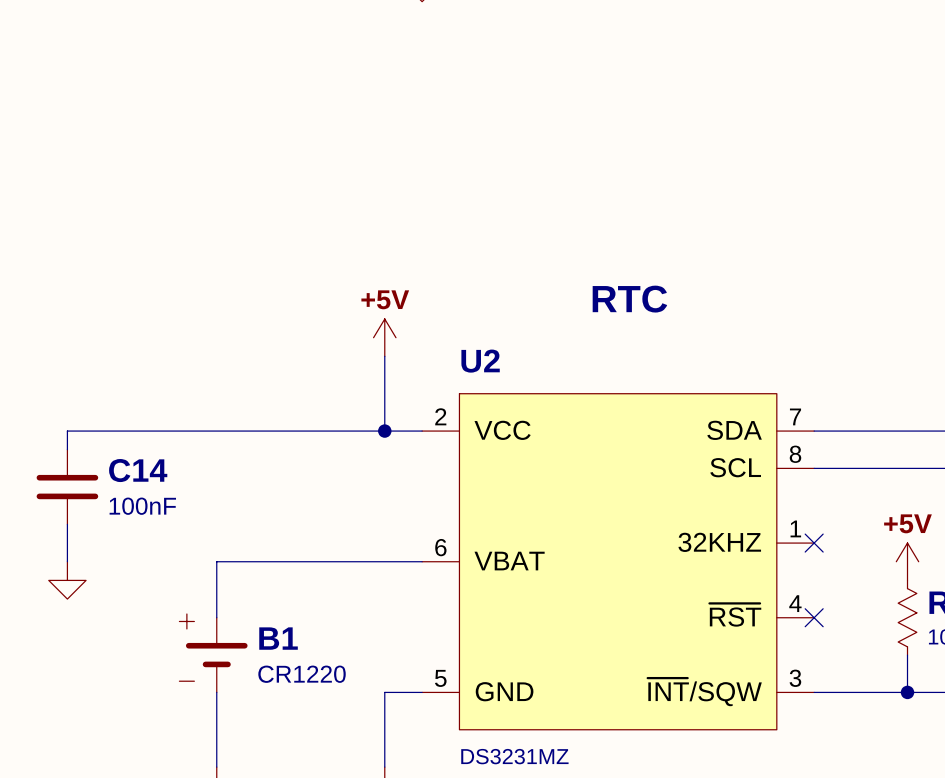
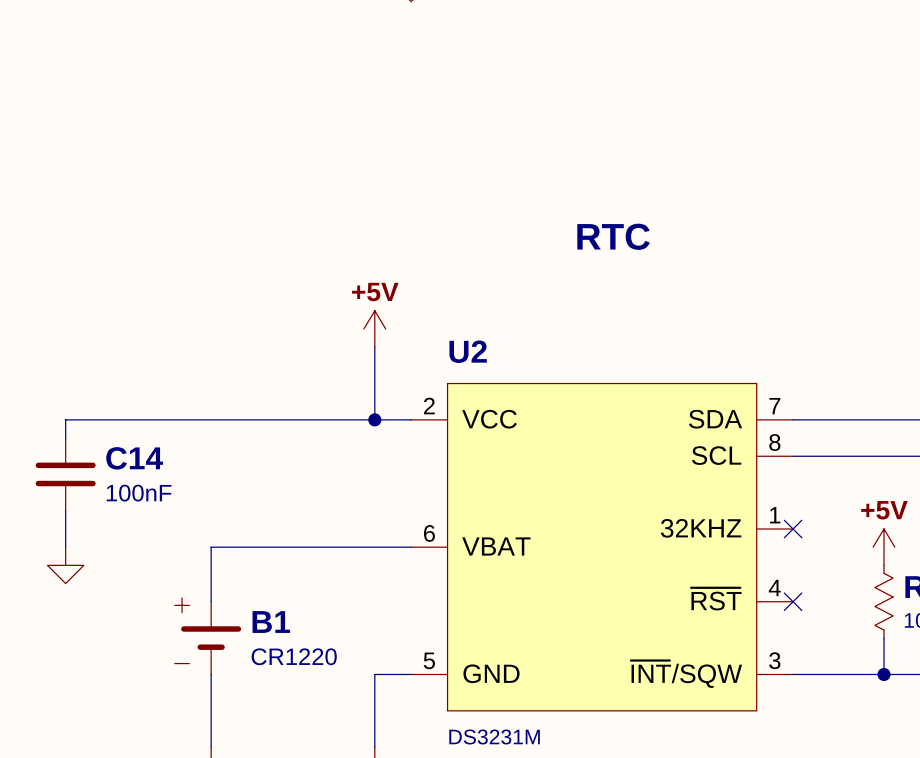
text position: RTC (629, 299) -> RTC (613, 236)
U2 value: DS3231MZ (514, 756) -> DS3231M (494, 736)

